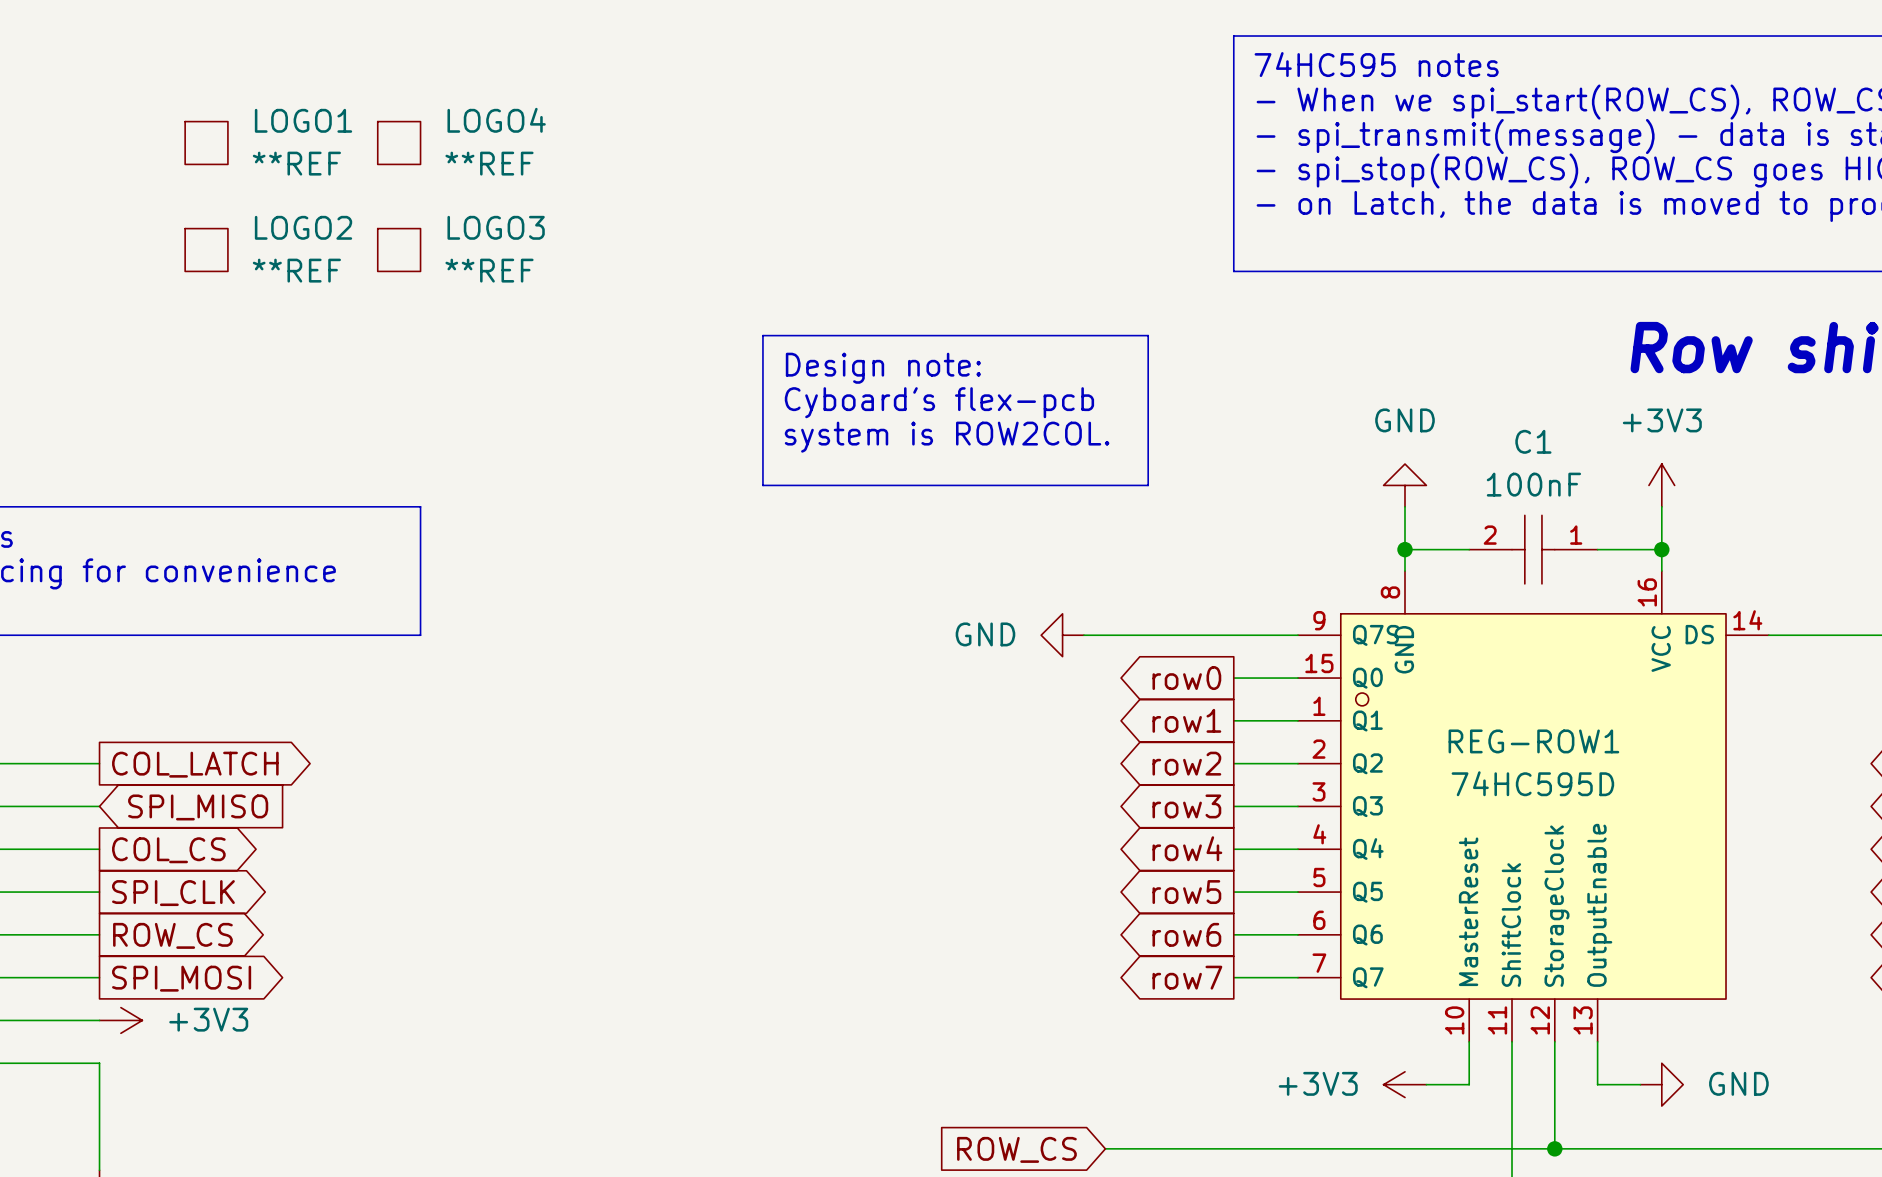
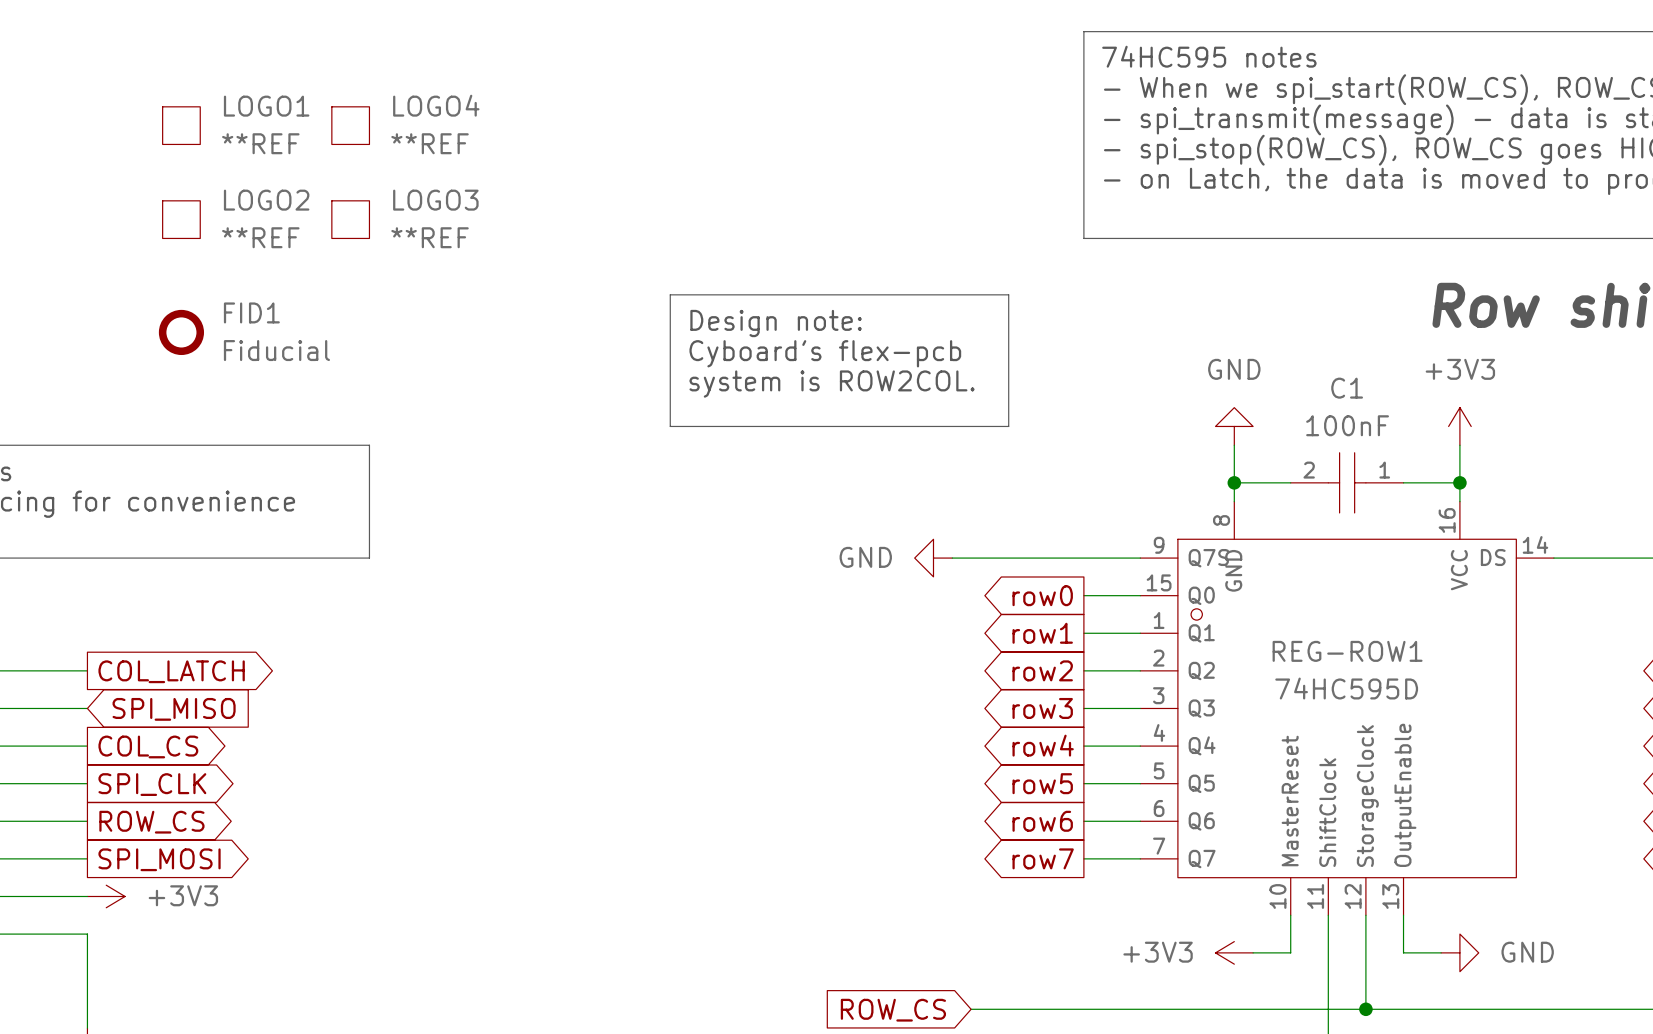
FID1: none -> Fiducial (181, 332)

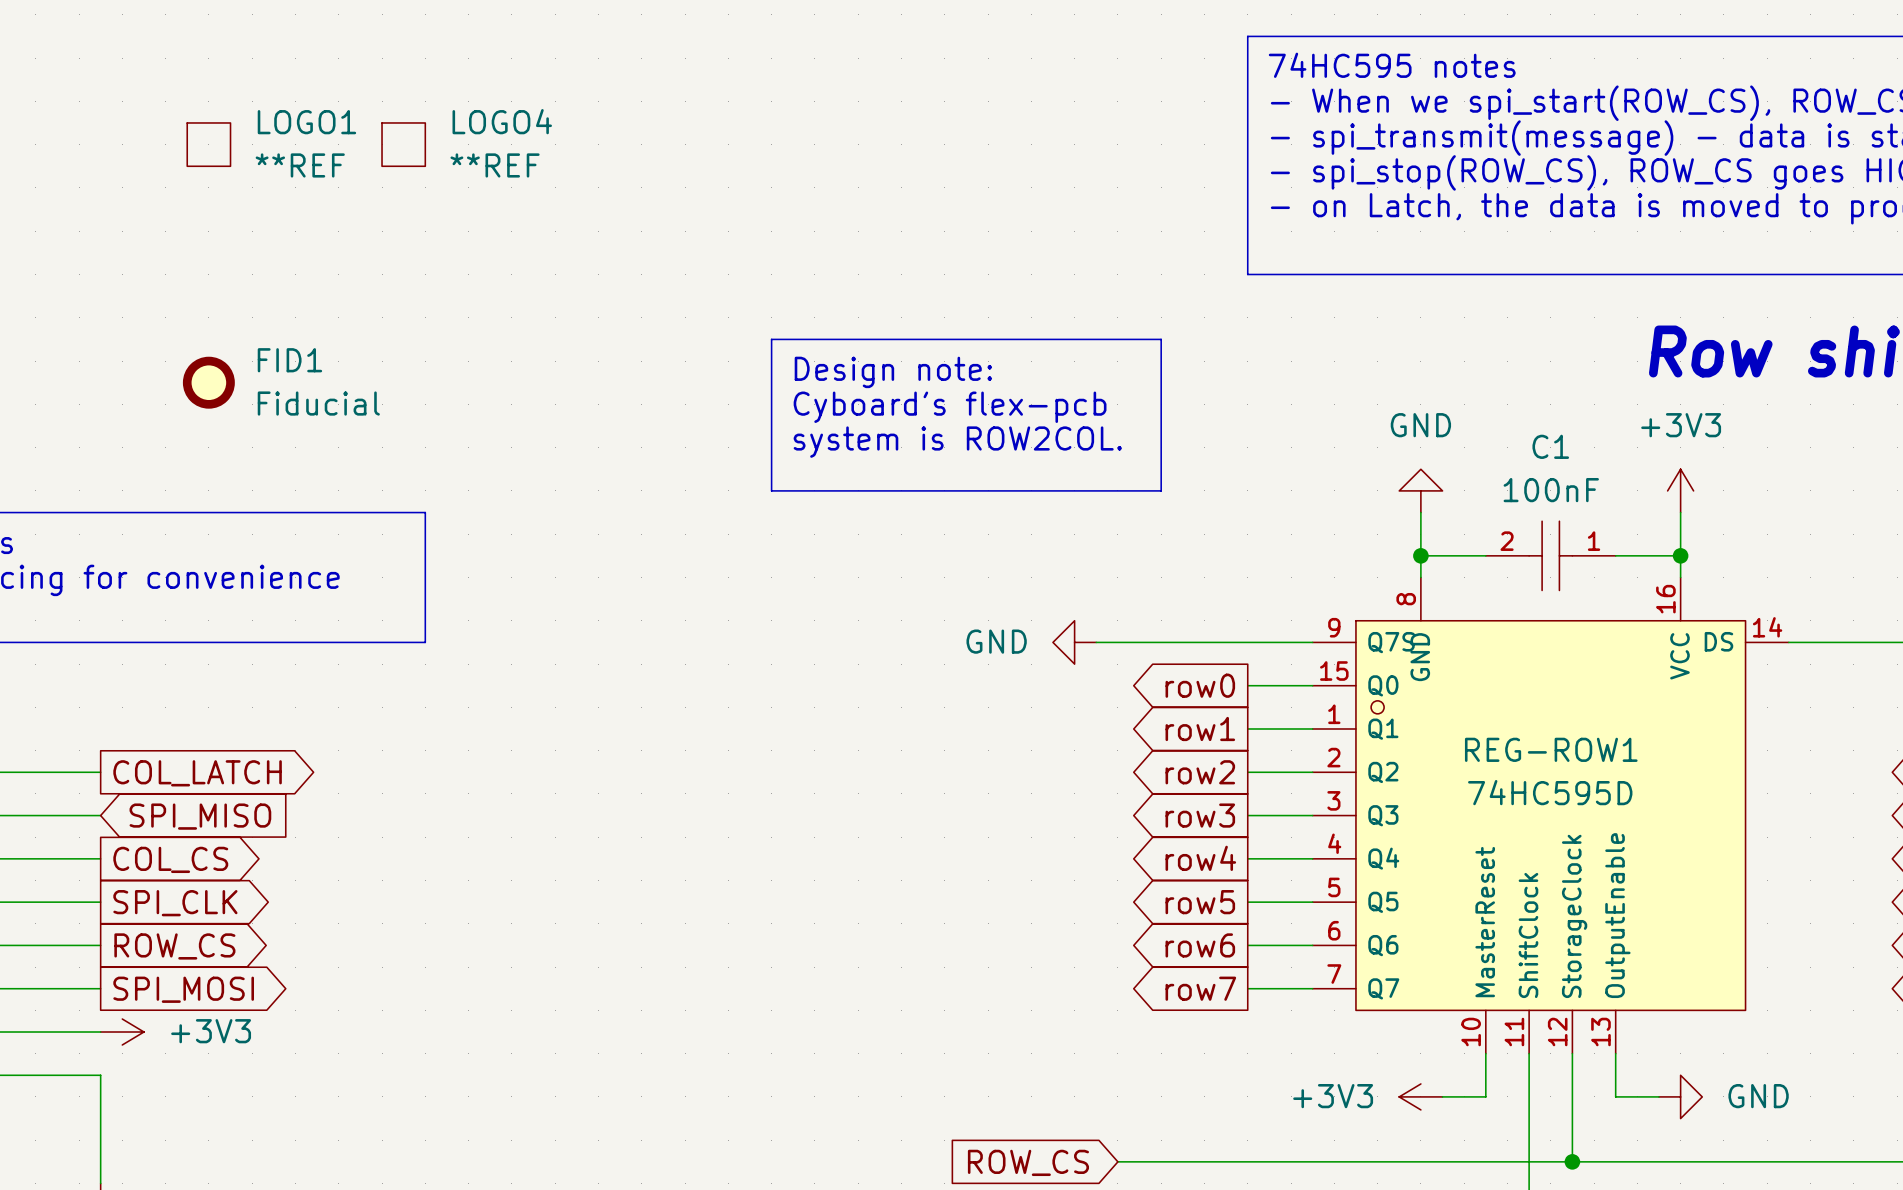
LOGO2: **REF (181, 219) -> none
LOGO3: **REF (350, 219) -> none

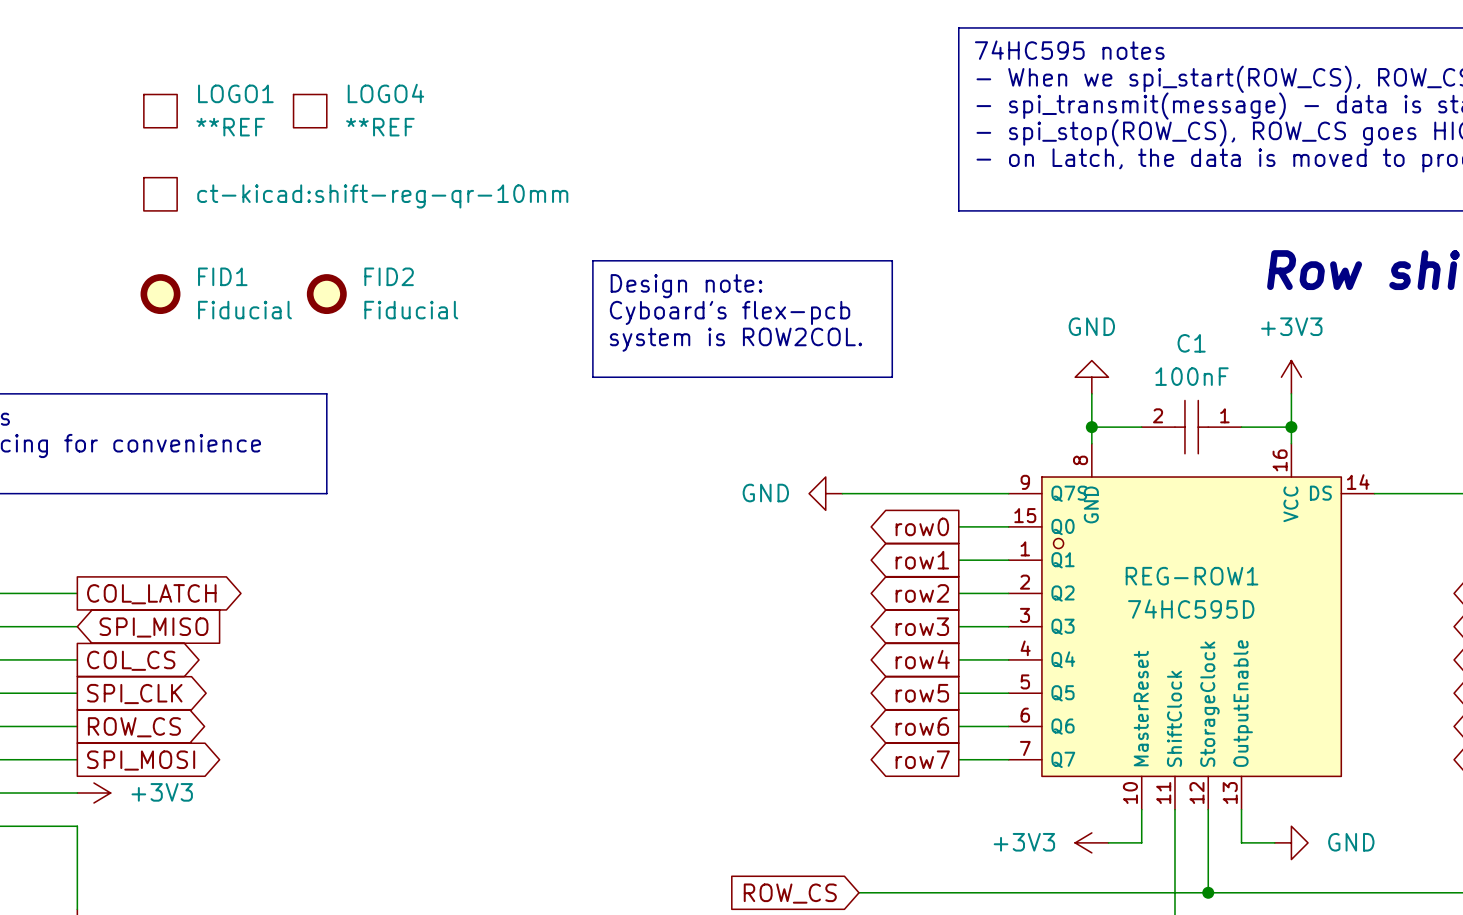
part: none -> (160, 194)
FID2: none -> Fiducial (326, 294)

